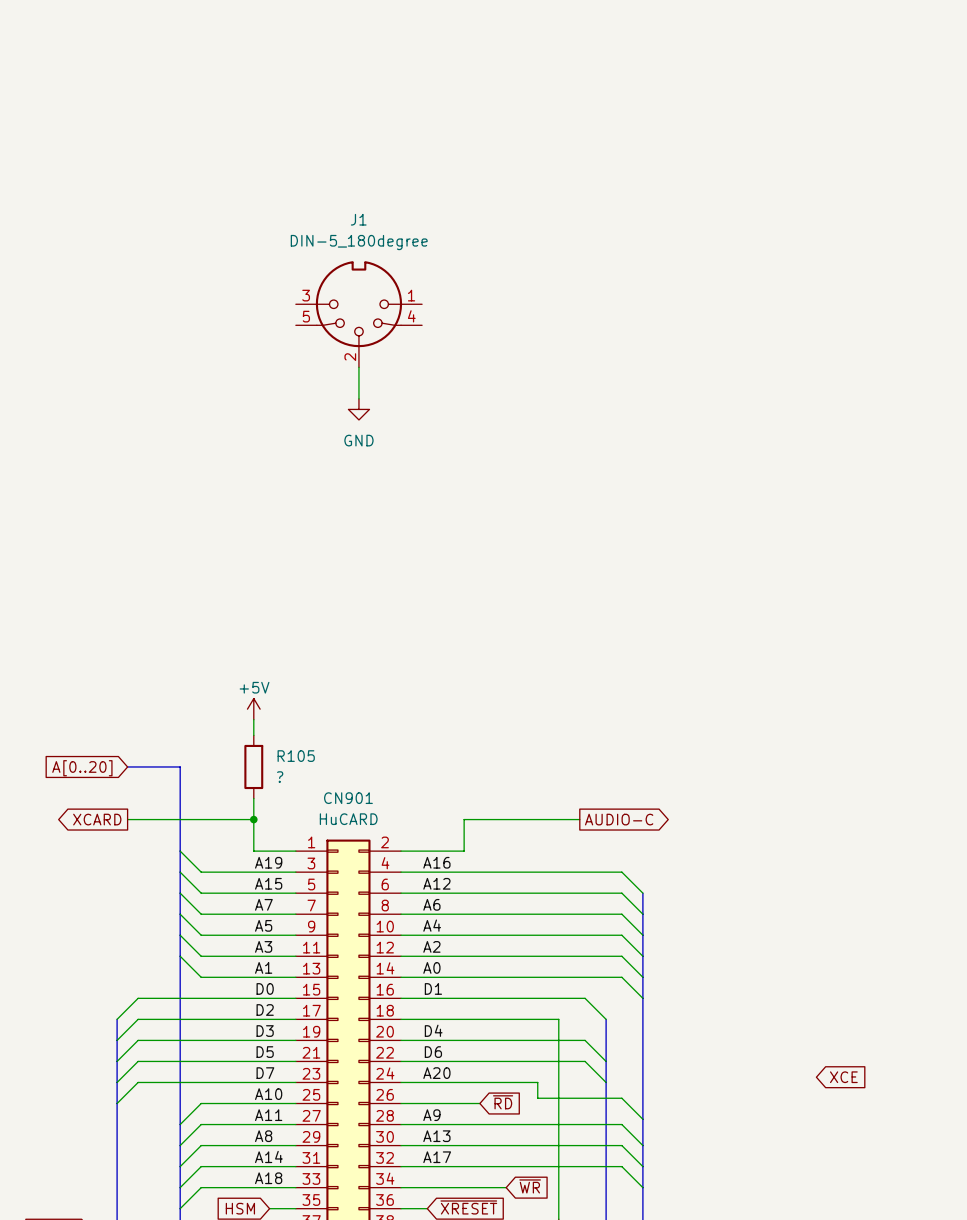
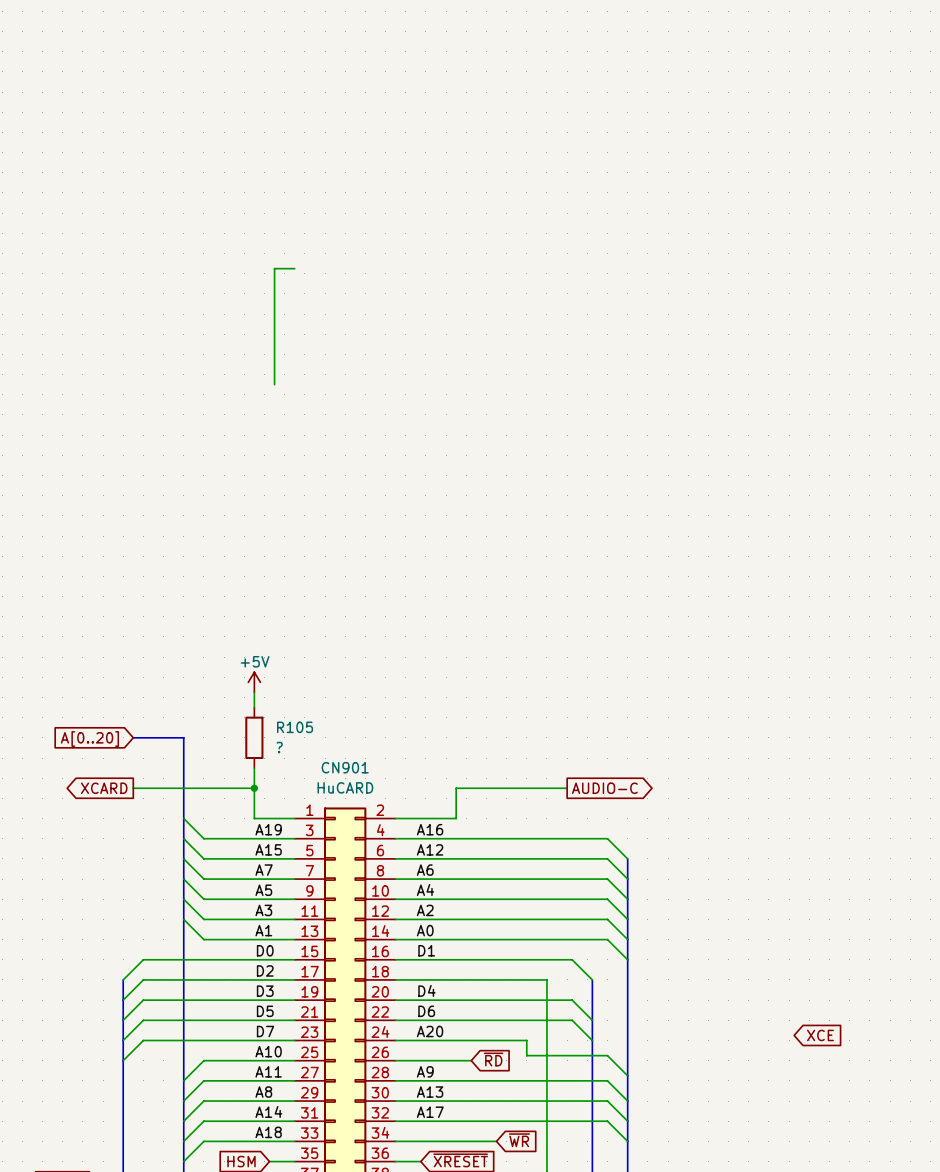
wire: none -> (294, 268) (274, 268) (274, 384)
J1: DIN-5_180degree (358, 314) -> none
wire: (358, 367) (358, 398) -> none
power symbol: GND (358, 409) -> none

